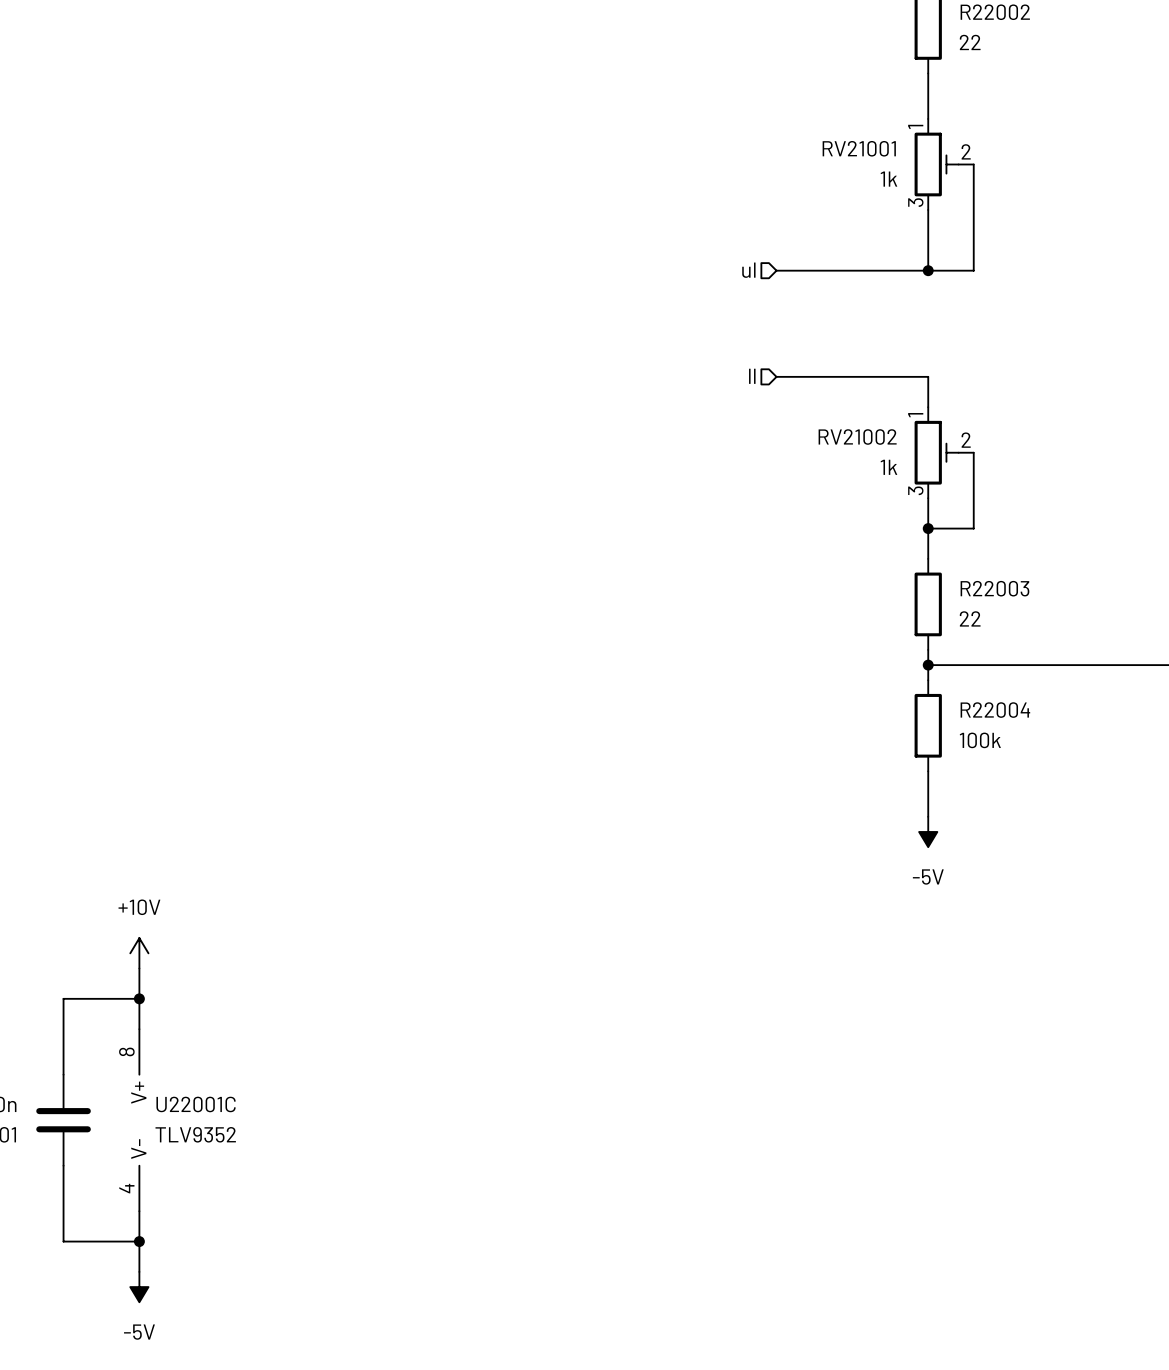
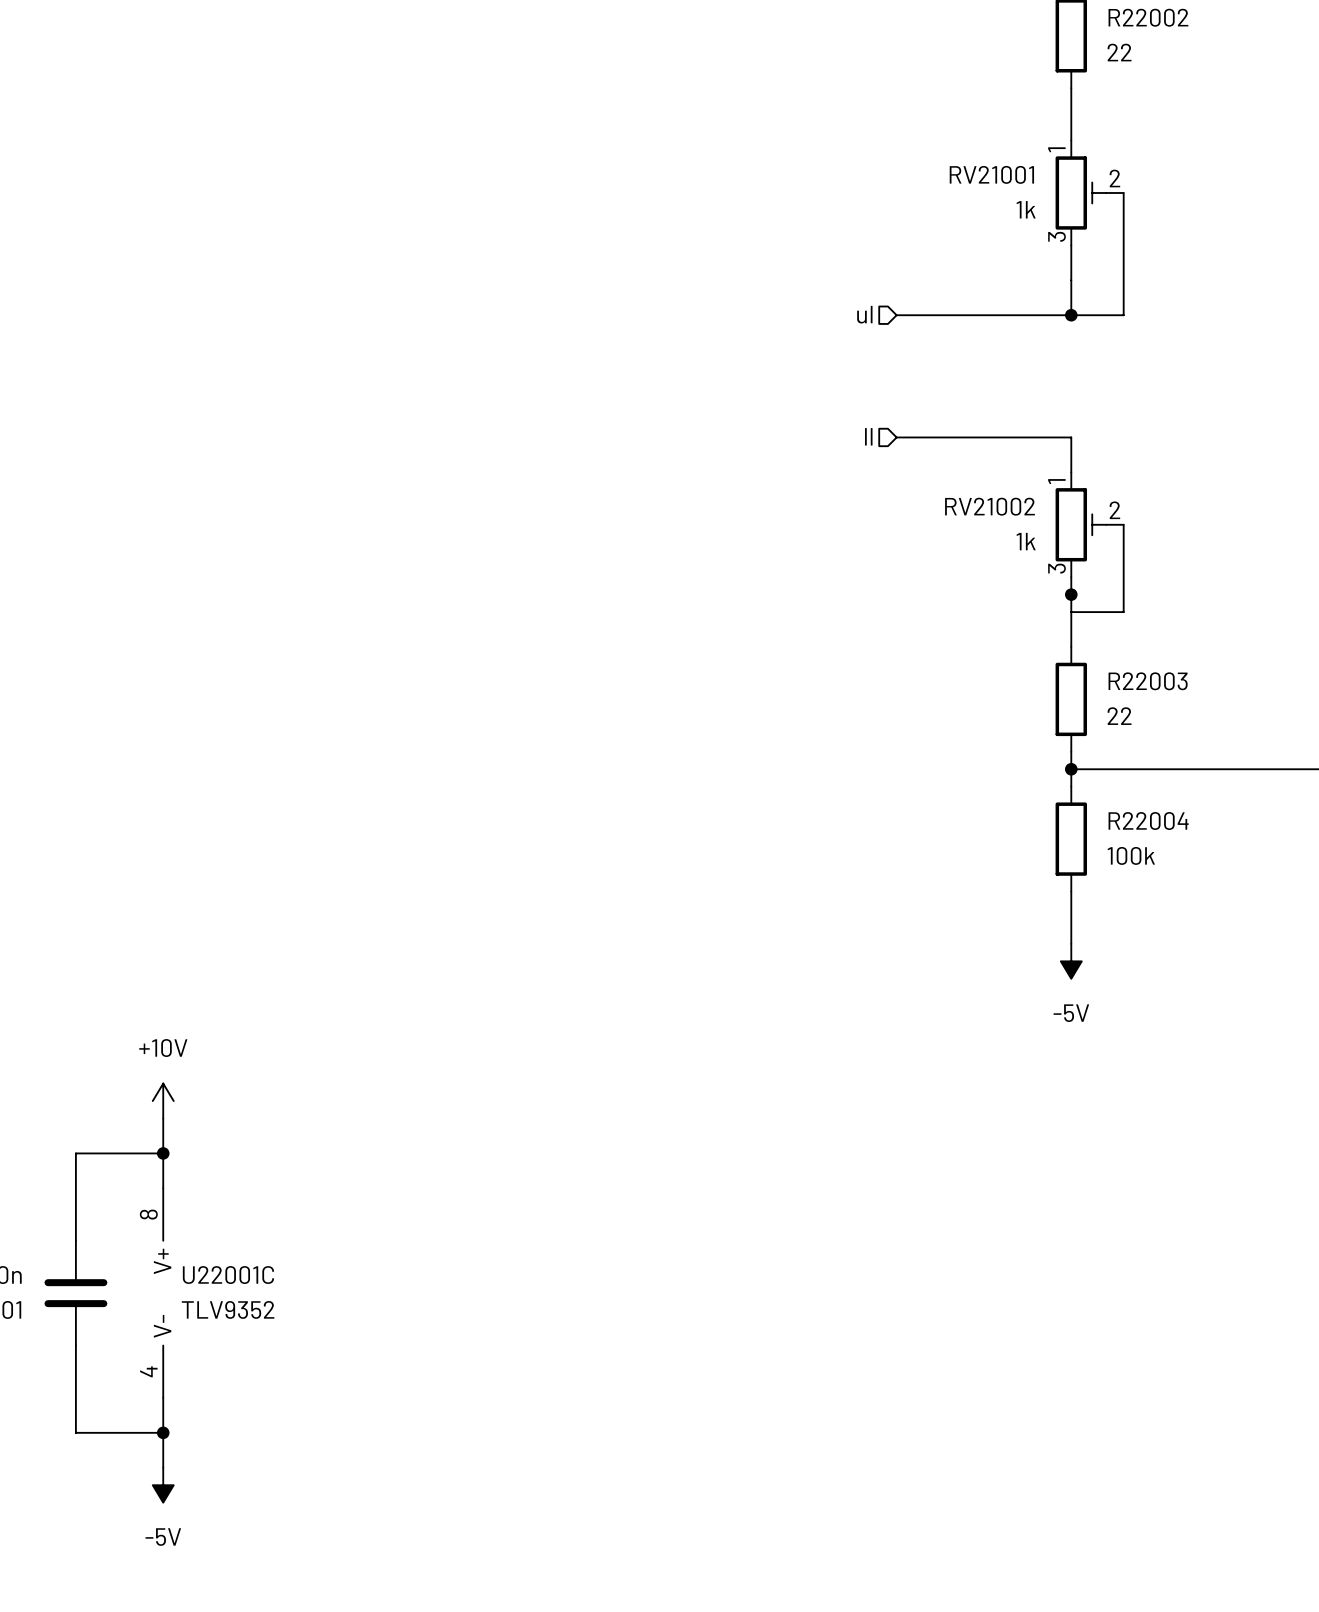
junction position: (928, 528) -> (1071, 594)

